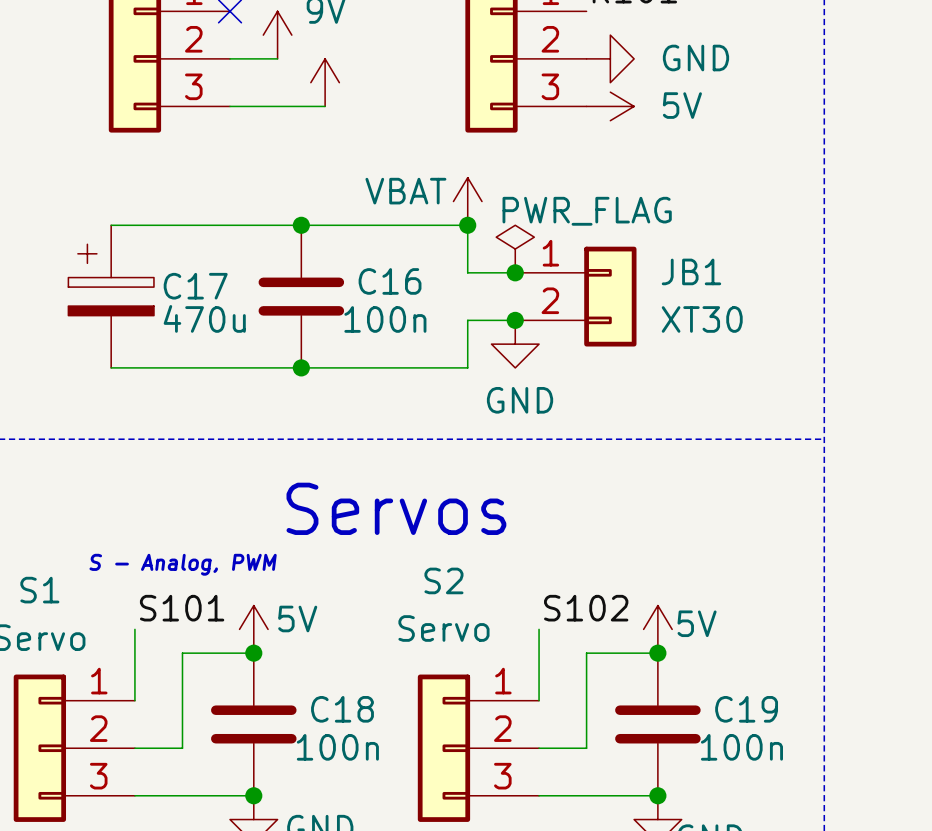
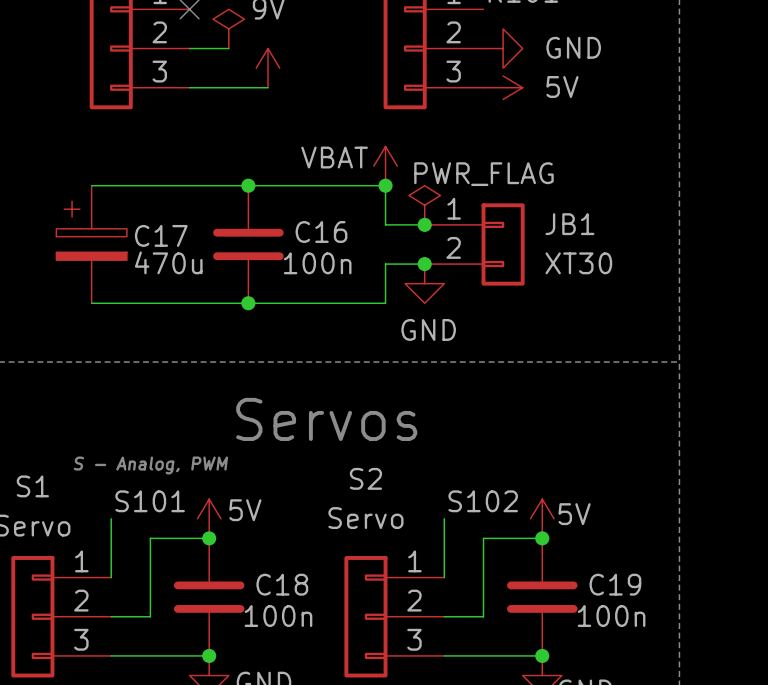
power symbol shape: [263, 11, 292, 59] -> [213, 9, 245, 49]

